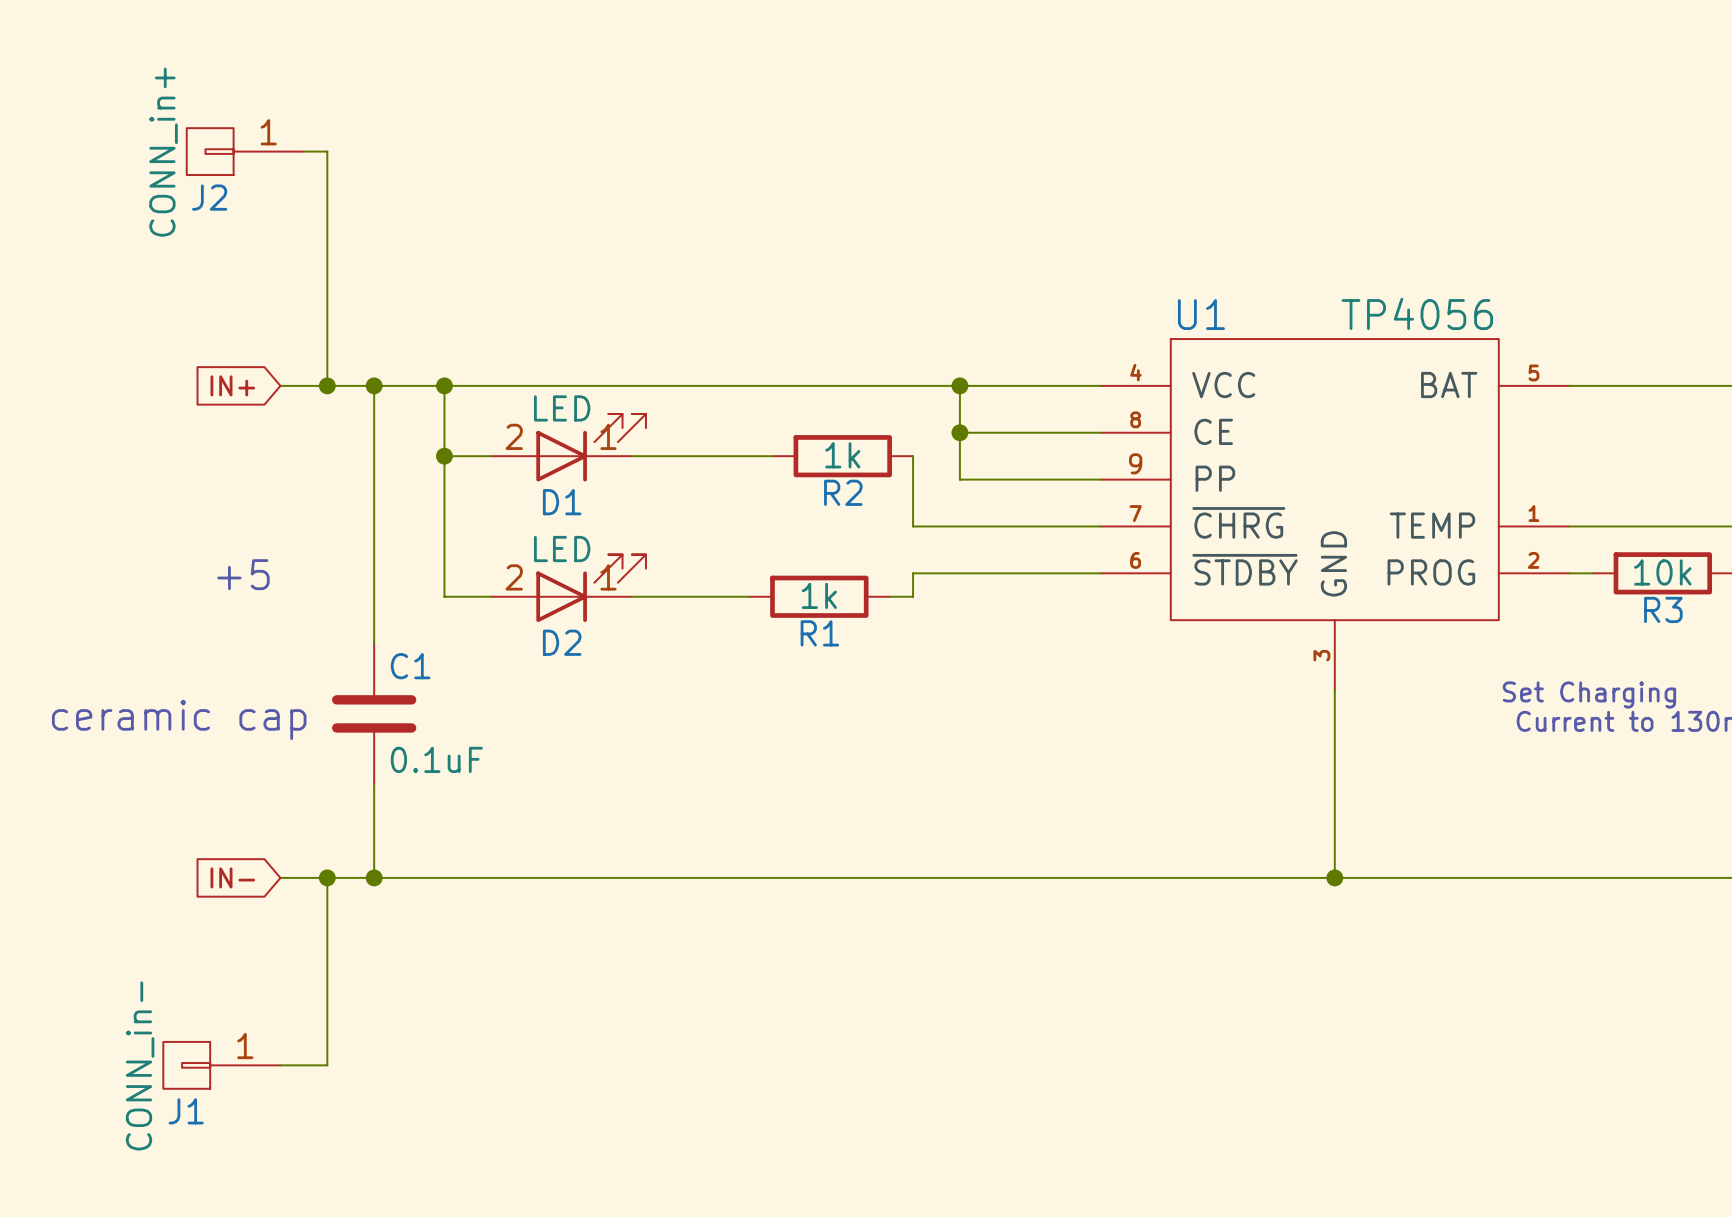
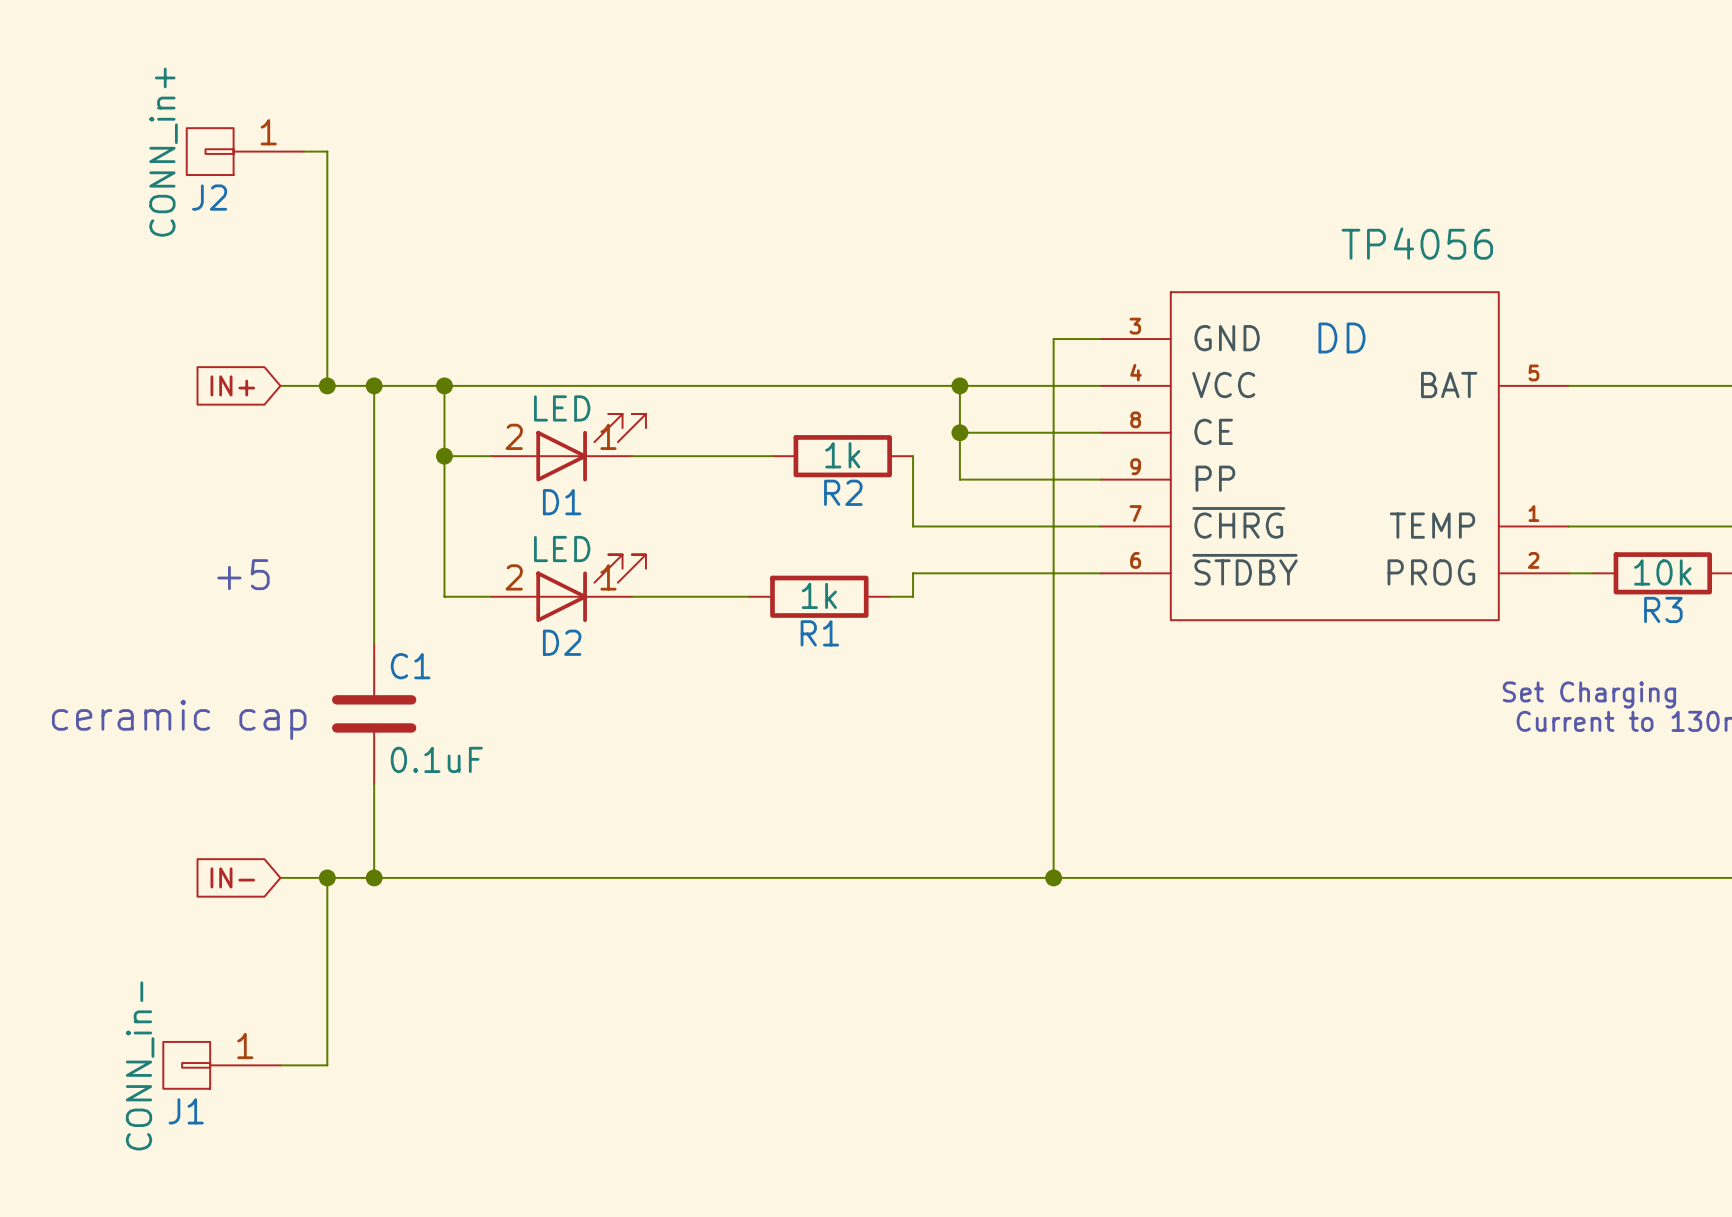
wire: none -> (1100, 339) (1053, 339) (1053, 877)
DD: none -> TP4056 (1334, 456)
U1: TP4056 (1334, 514) -> none
wire: (1334, 690) (1334, 877) -> none
junction: none -> (1053, 877)
junction: (1334, 877) -> none

